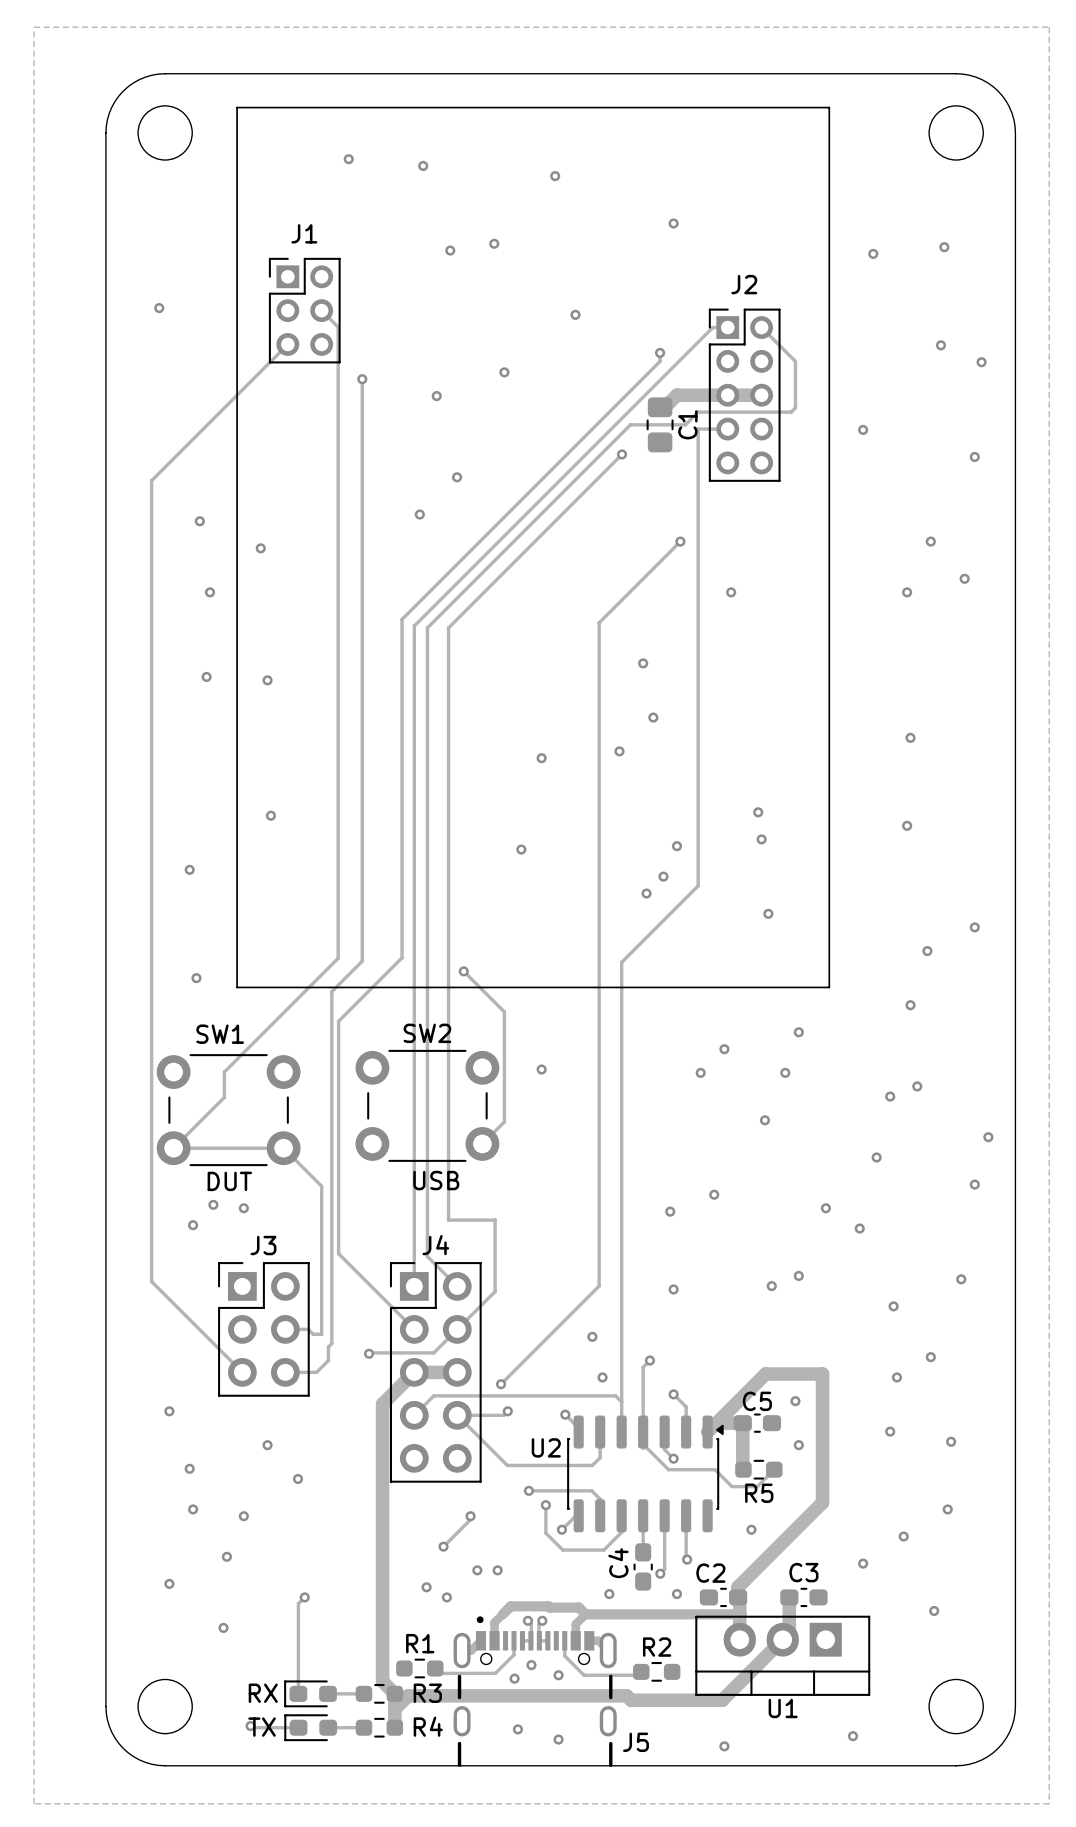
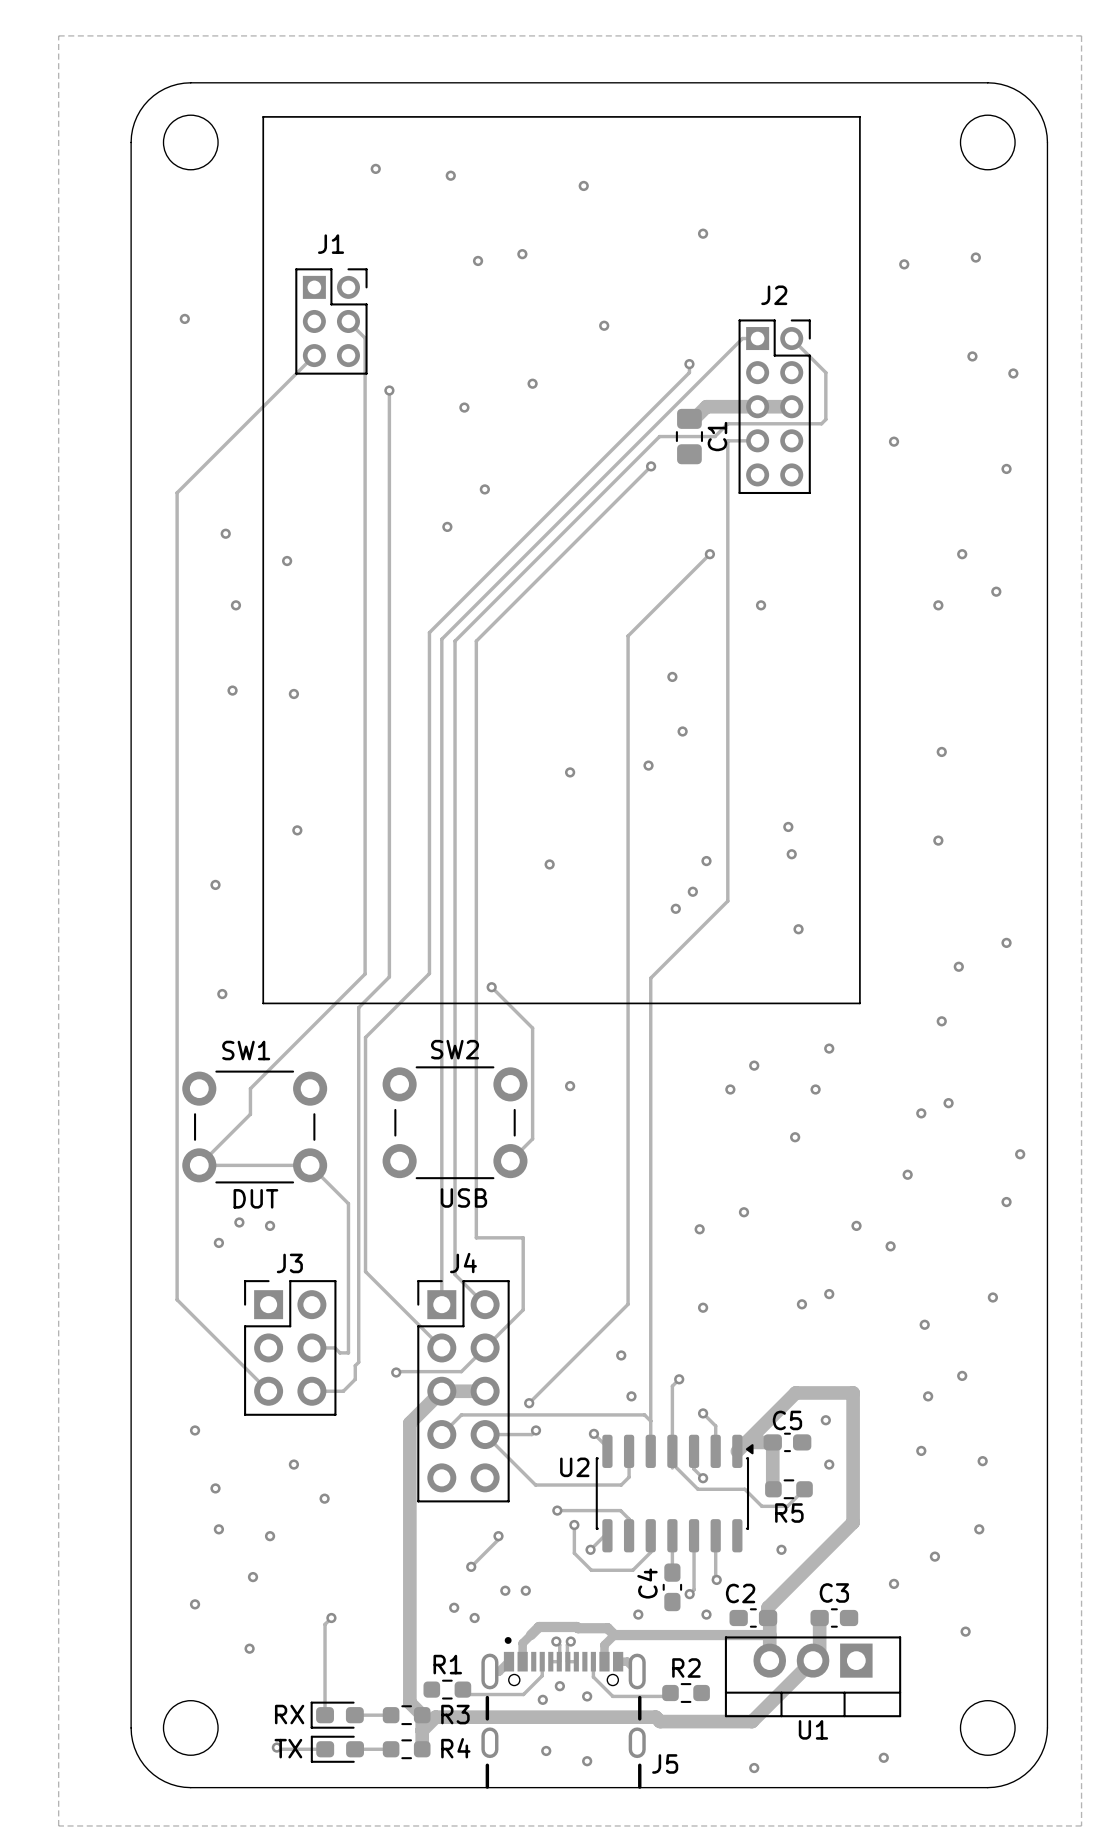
J1 footprint: [268, 257, 341, 364] -> [295, 268, 368, 375]
J2 footprint: [708, 308, 781, 482] -> [738, 319, 811, 495]

